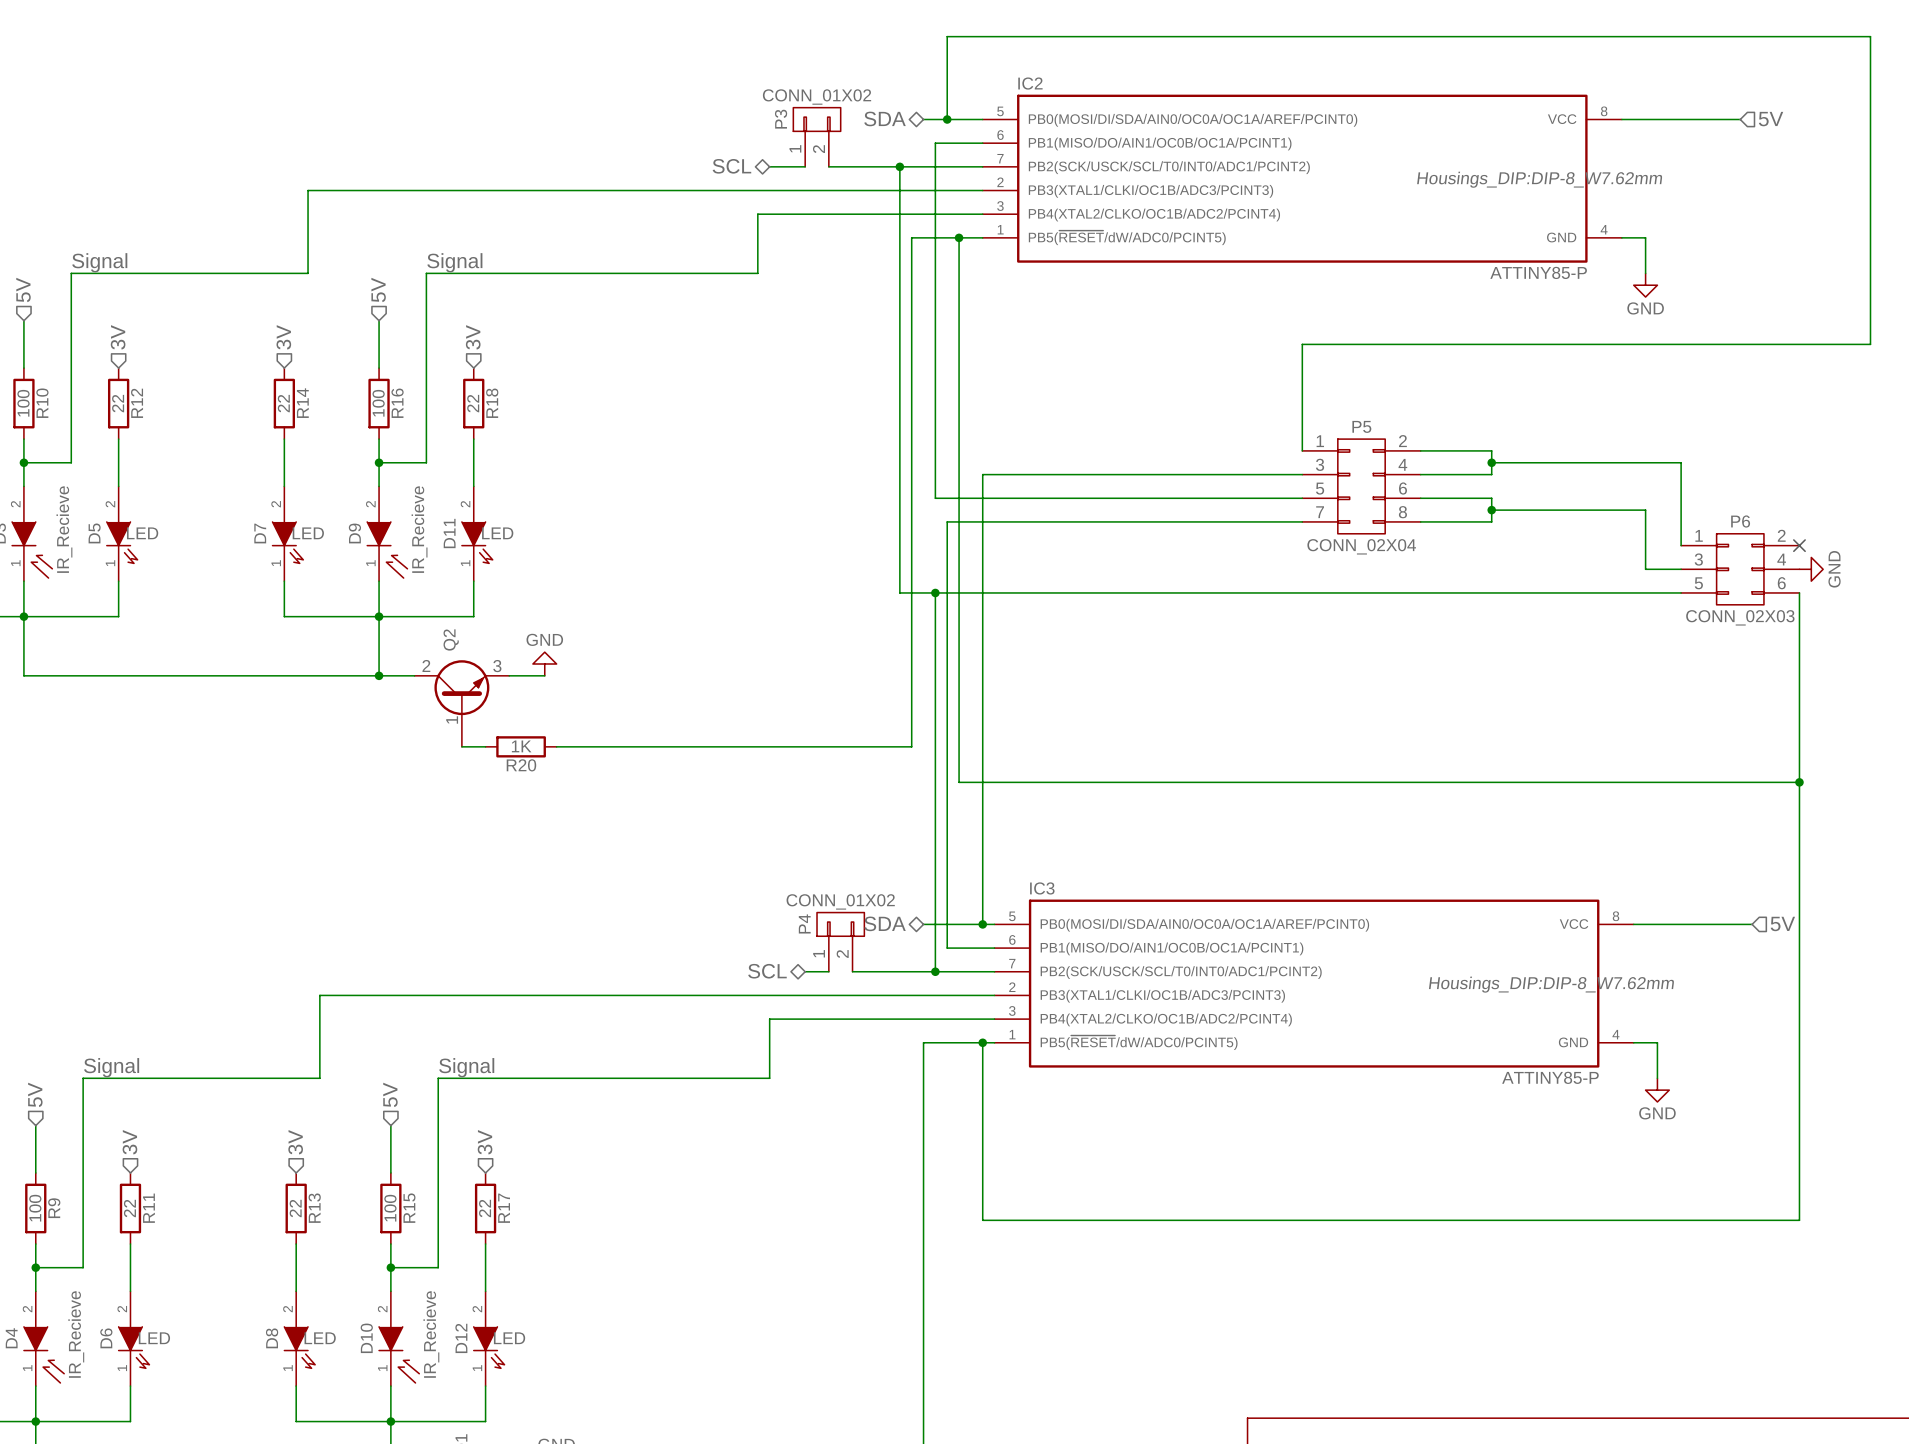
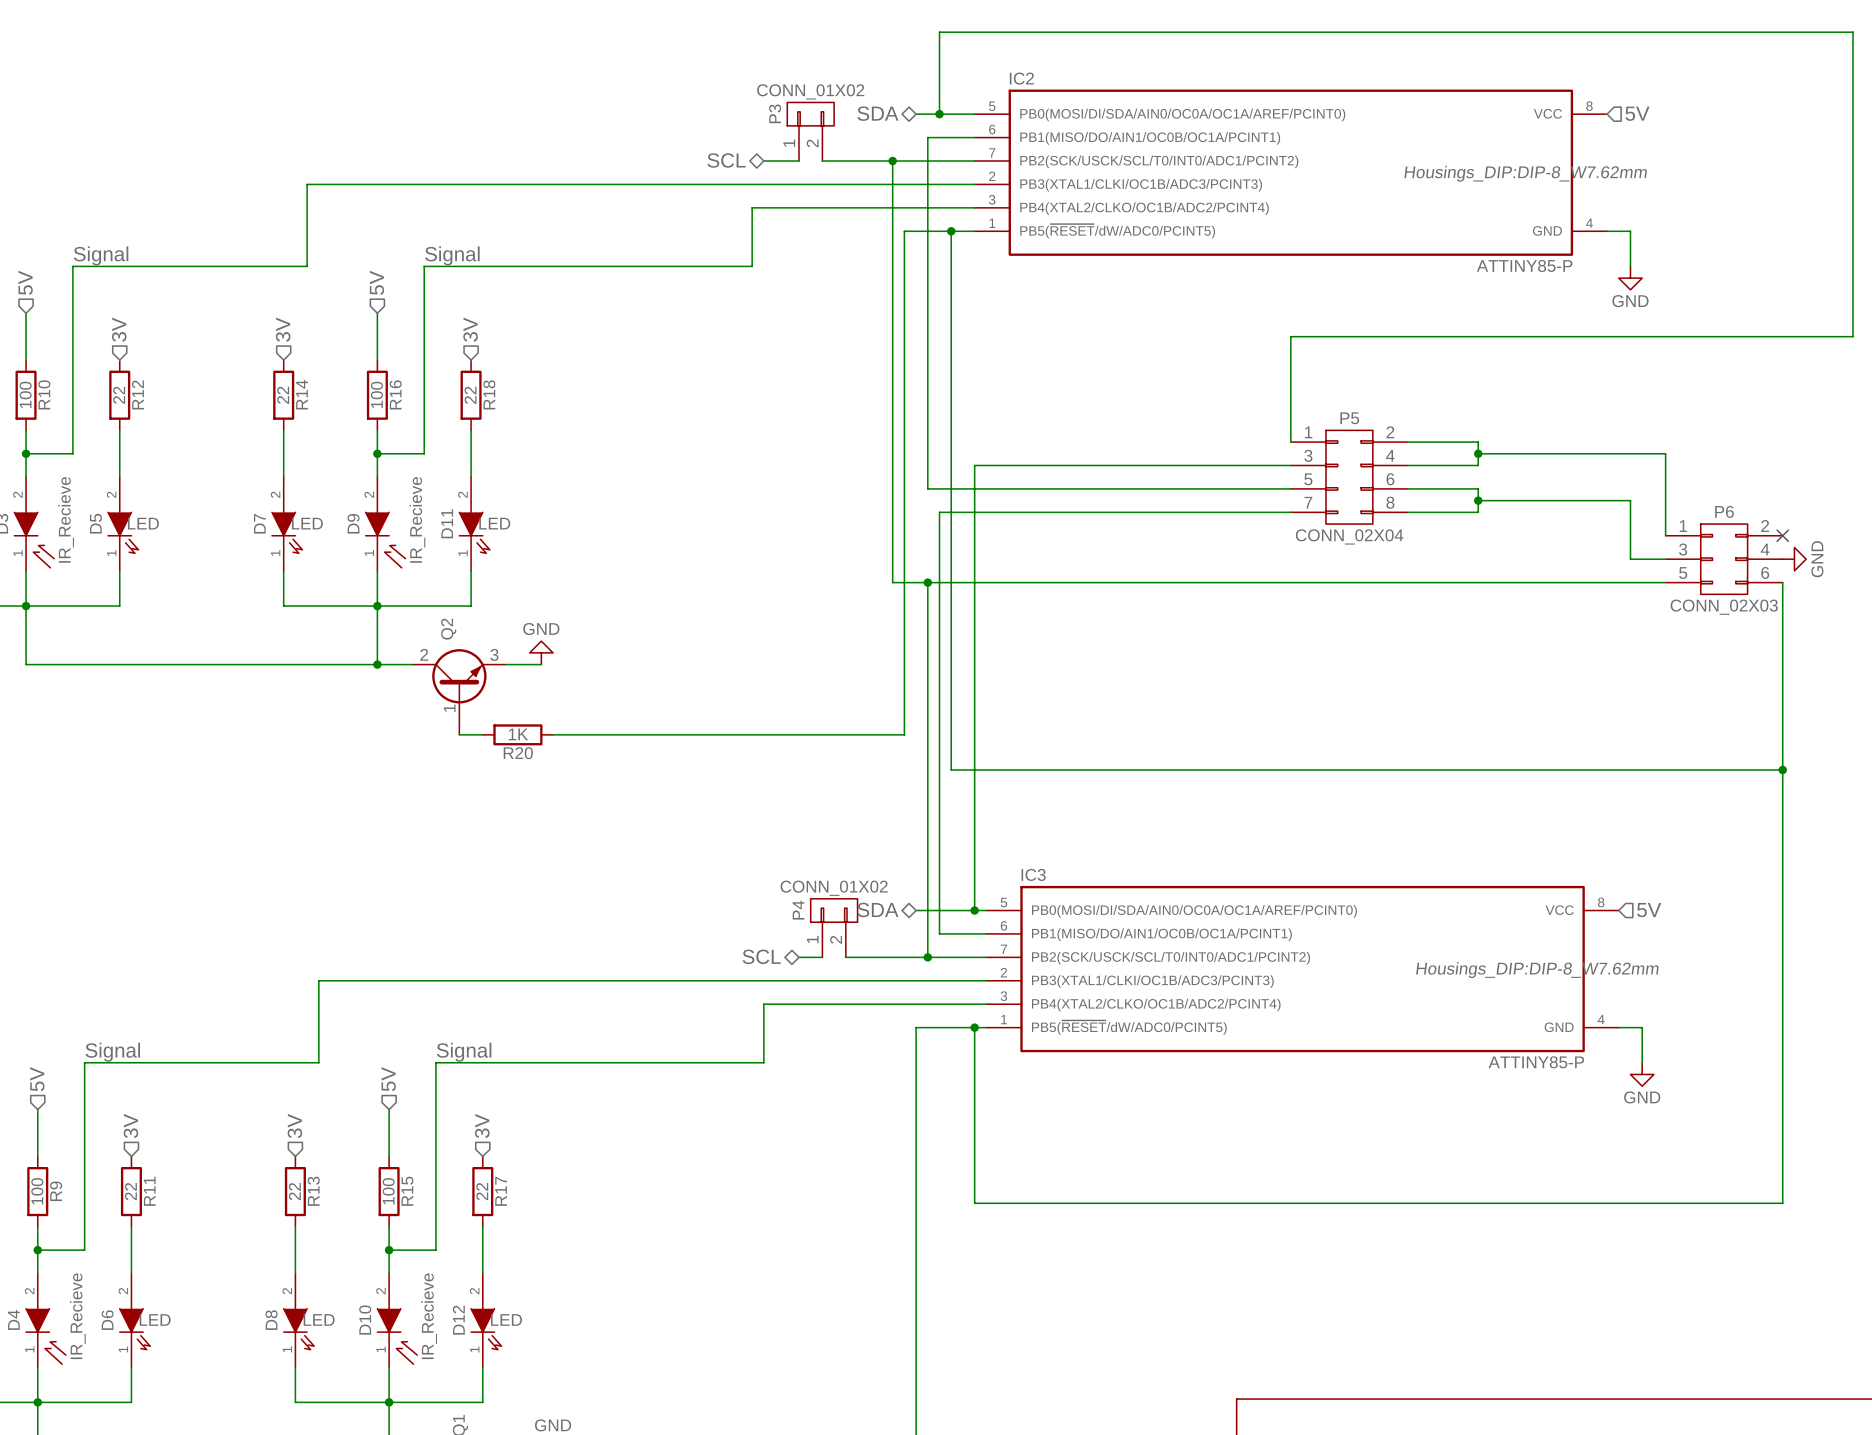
wire: (1621, 119) (1740, 119) -> none
hierarchical label position: 5V (1771, 119) -> 5V (1637, 113)
hierarchical label position: 5V (1782, 923) -> 5V (1649, 910)
wire: (1633, 924) (1752, 924) -> none

